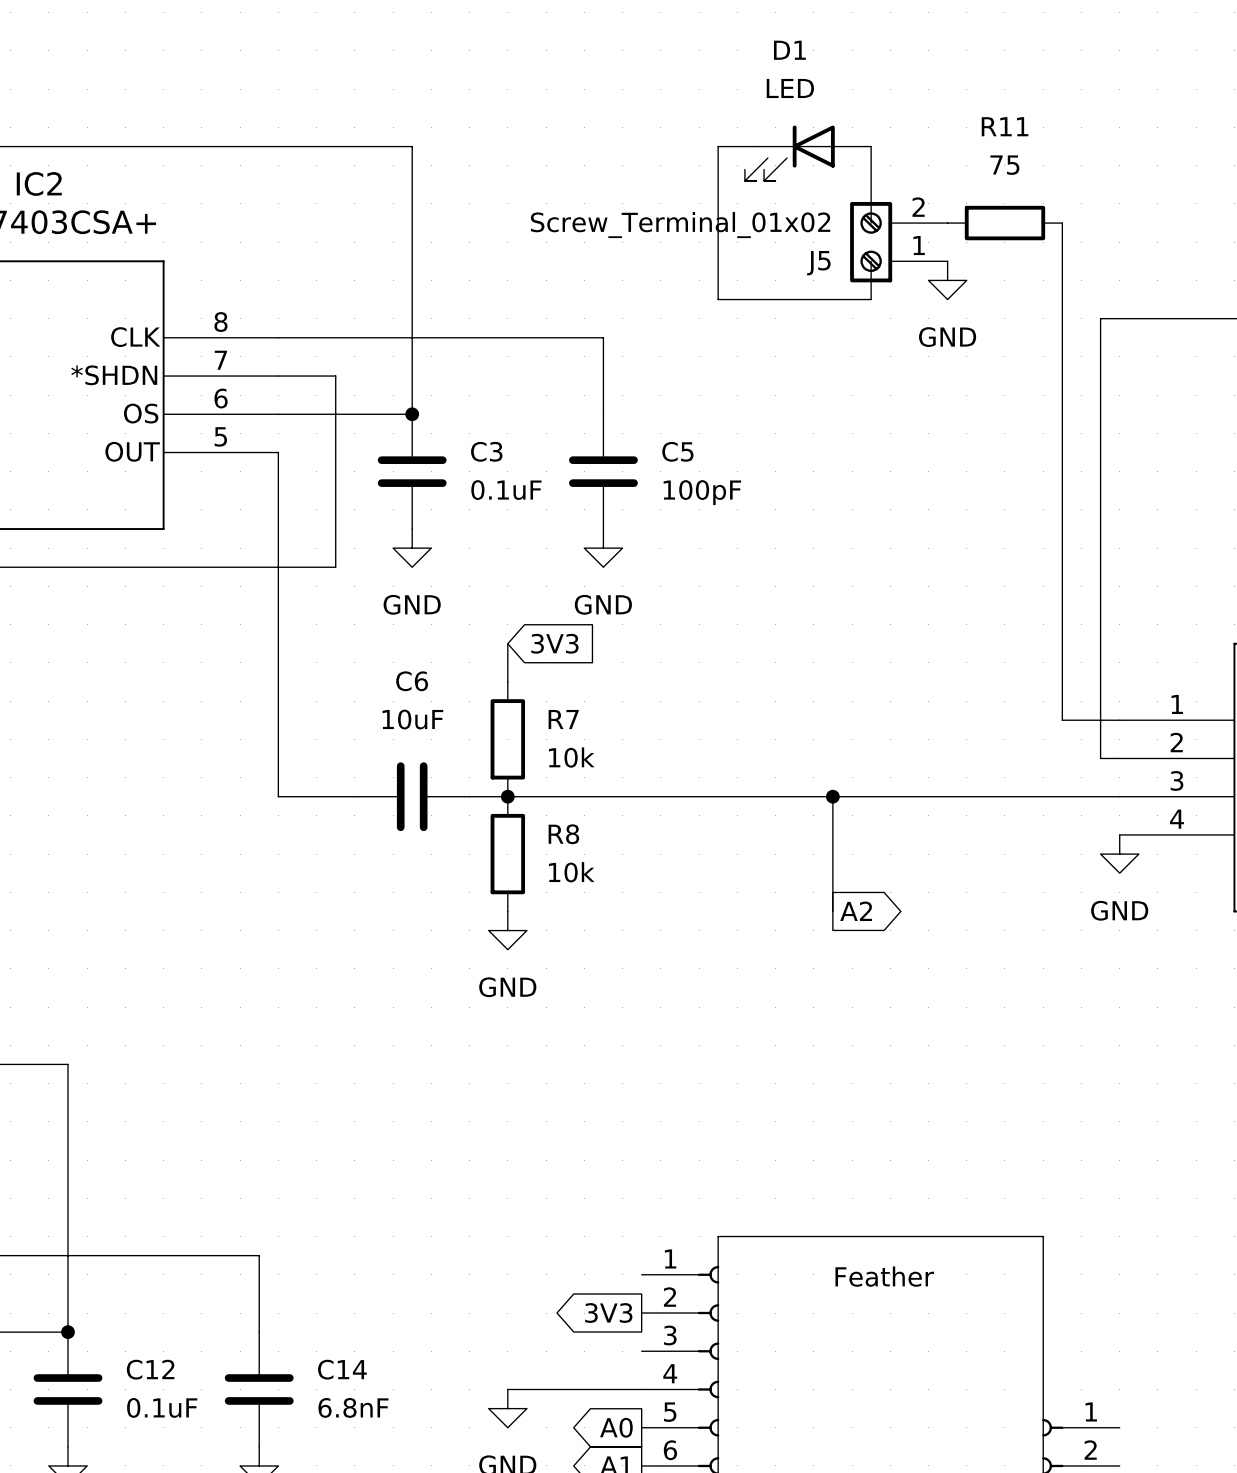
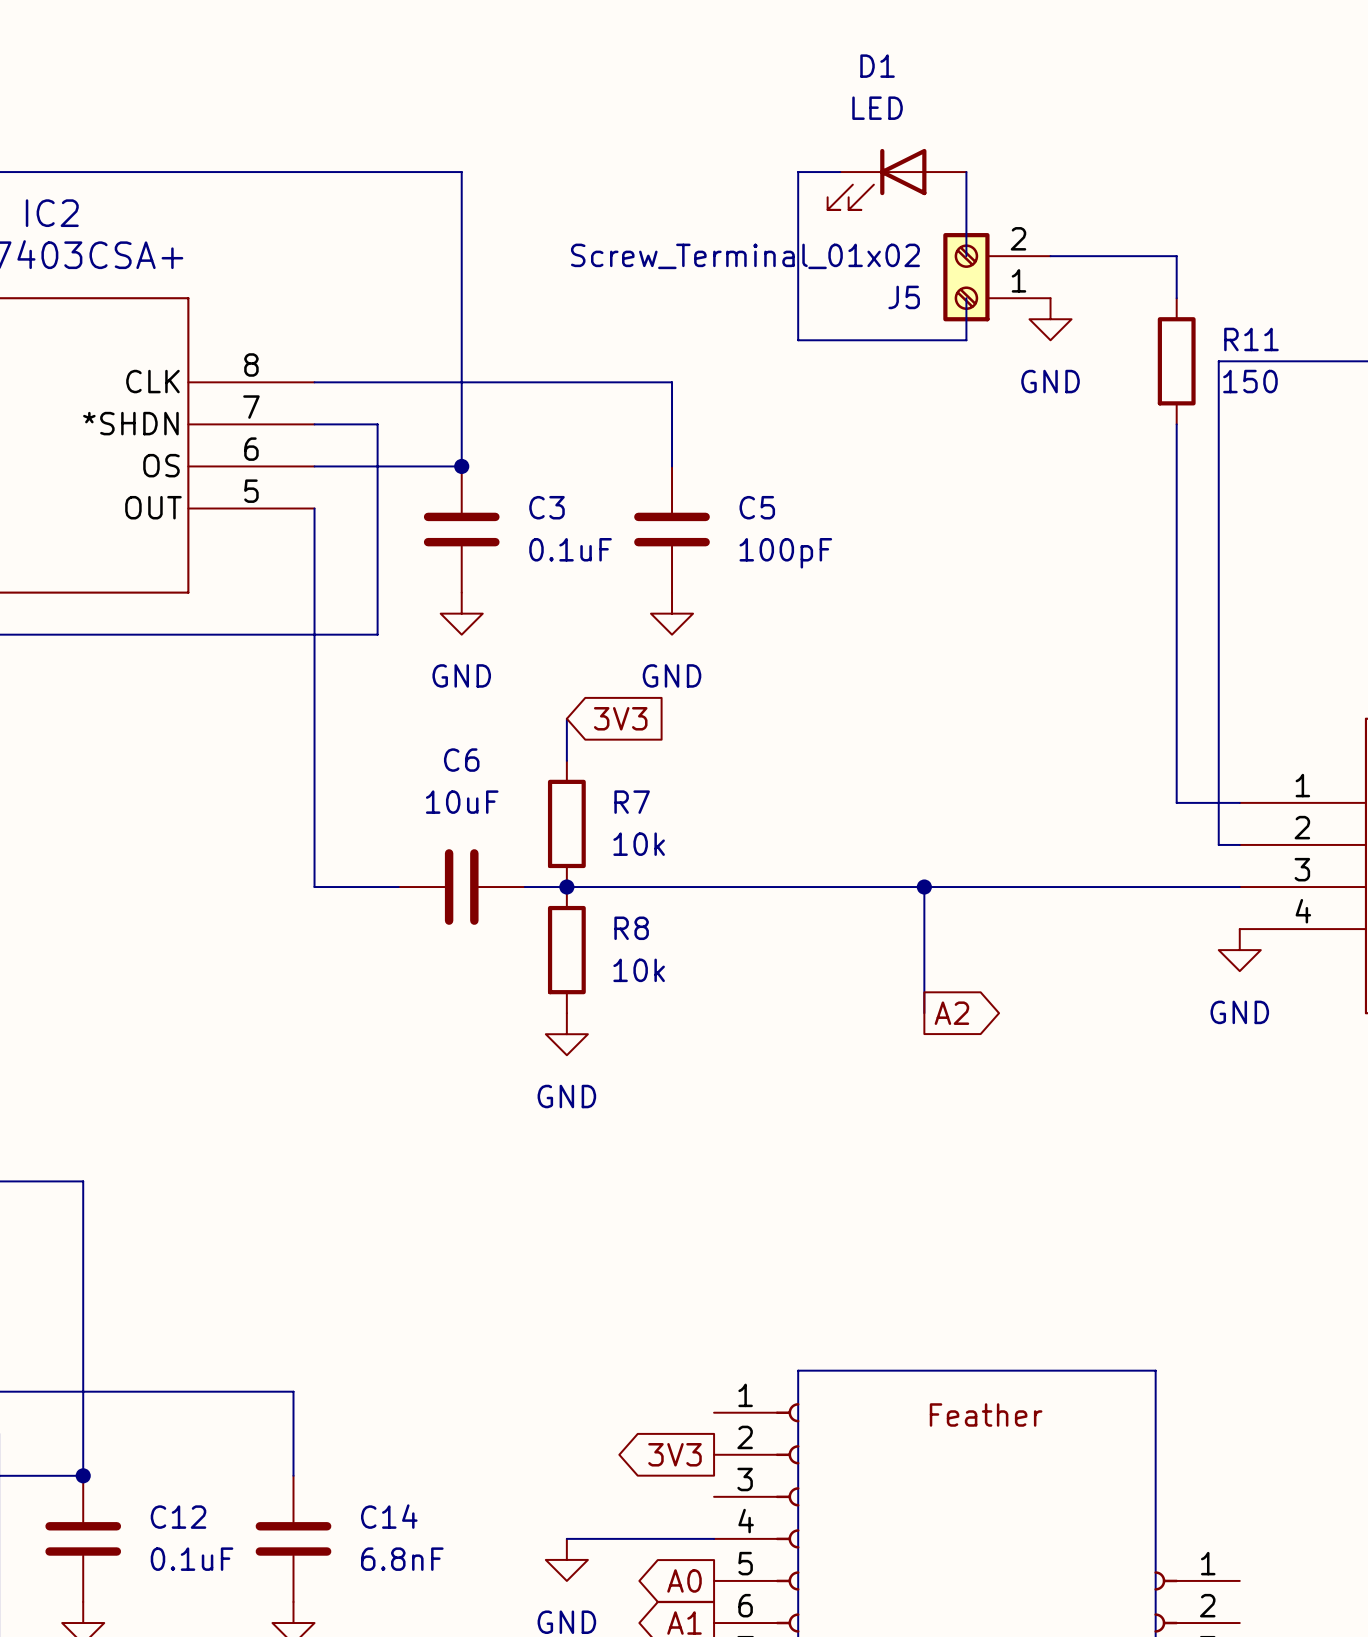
R11 name position: R11 (1005, 126) -> R11 (1251, 339)
R11 value: 75 (1004, 165) -> 150 (1250, 381)
wire: none -> (1050, 256) (1176, 256)
R11 rotation: 0° (1004, 223) -> 90° clockwise (1176, 361)
R11 position: (1004, 223) -> (1176, 361)
wire: (1062, 261) (1062, 376) -> none

